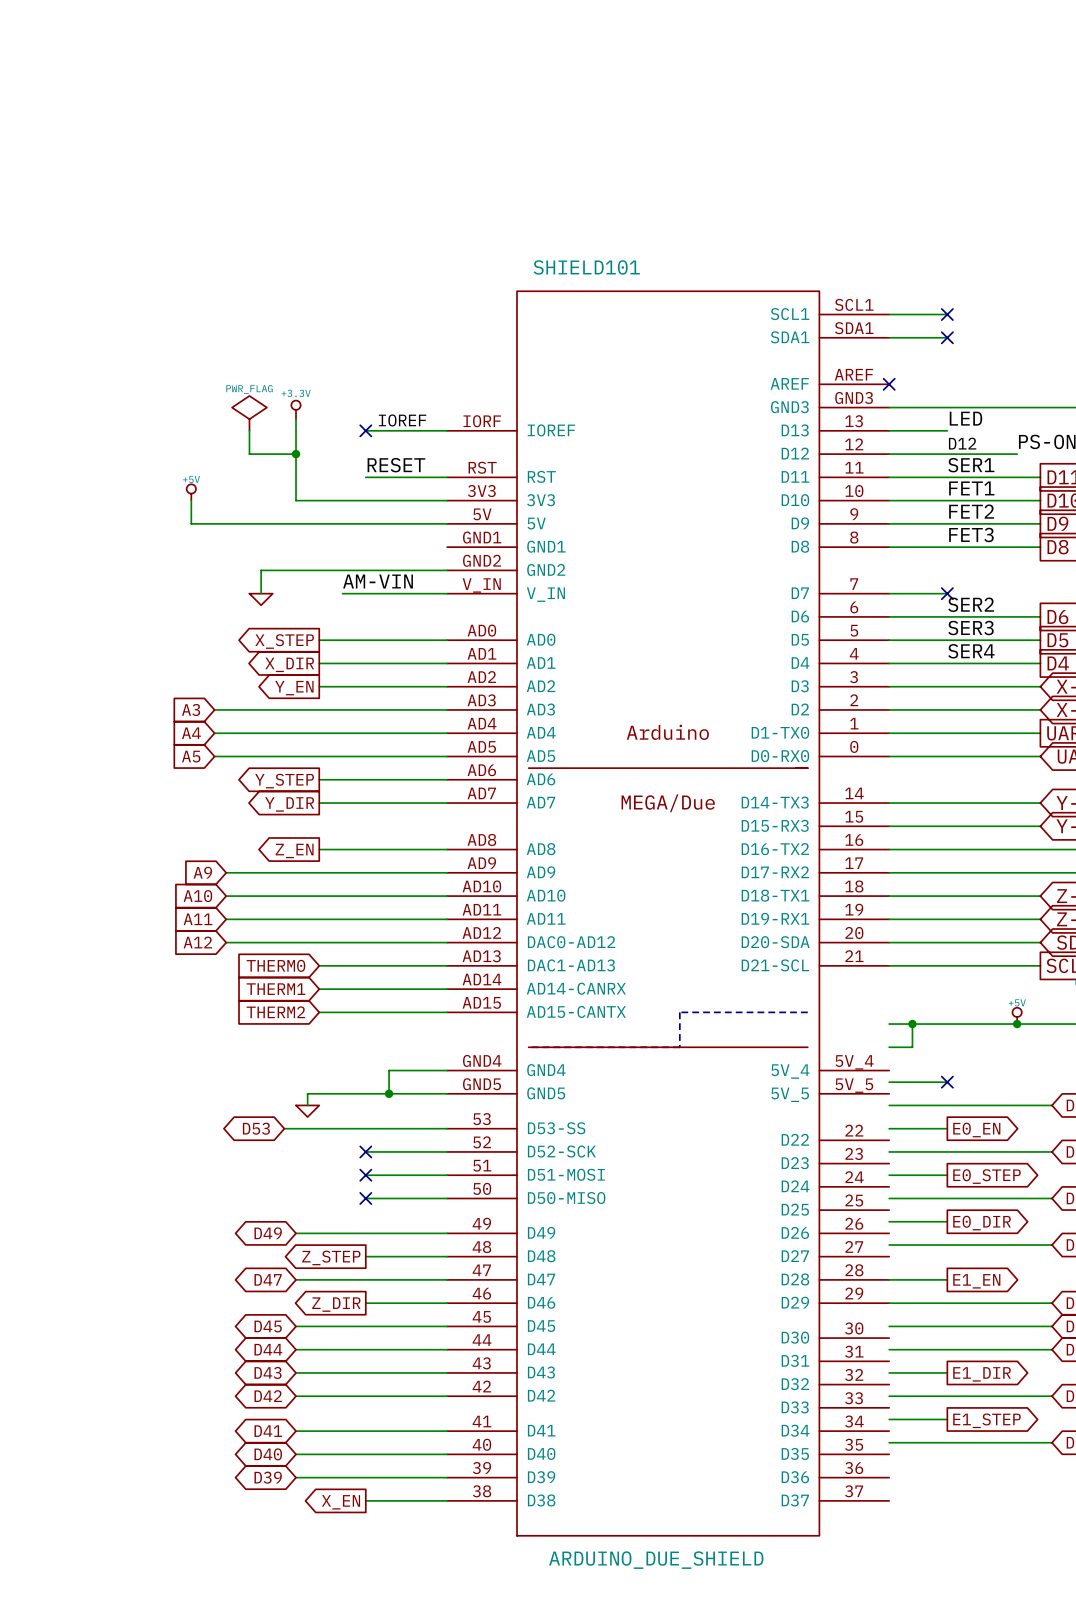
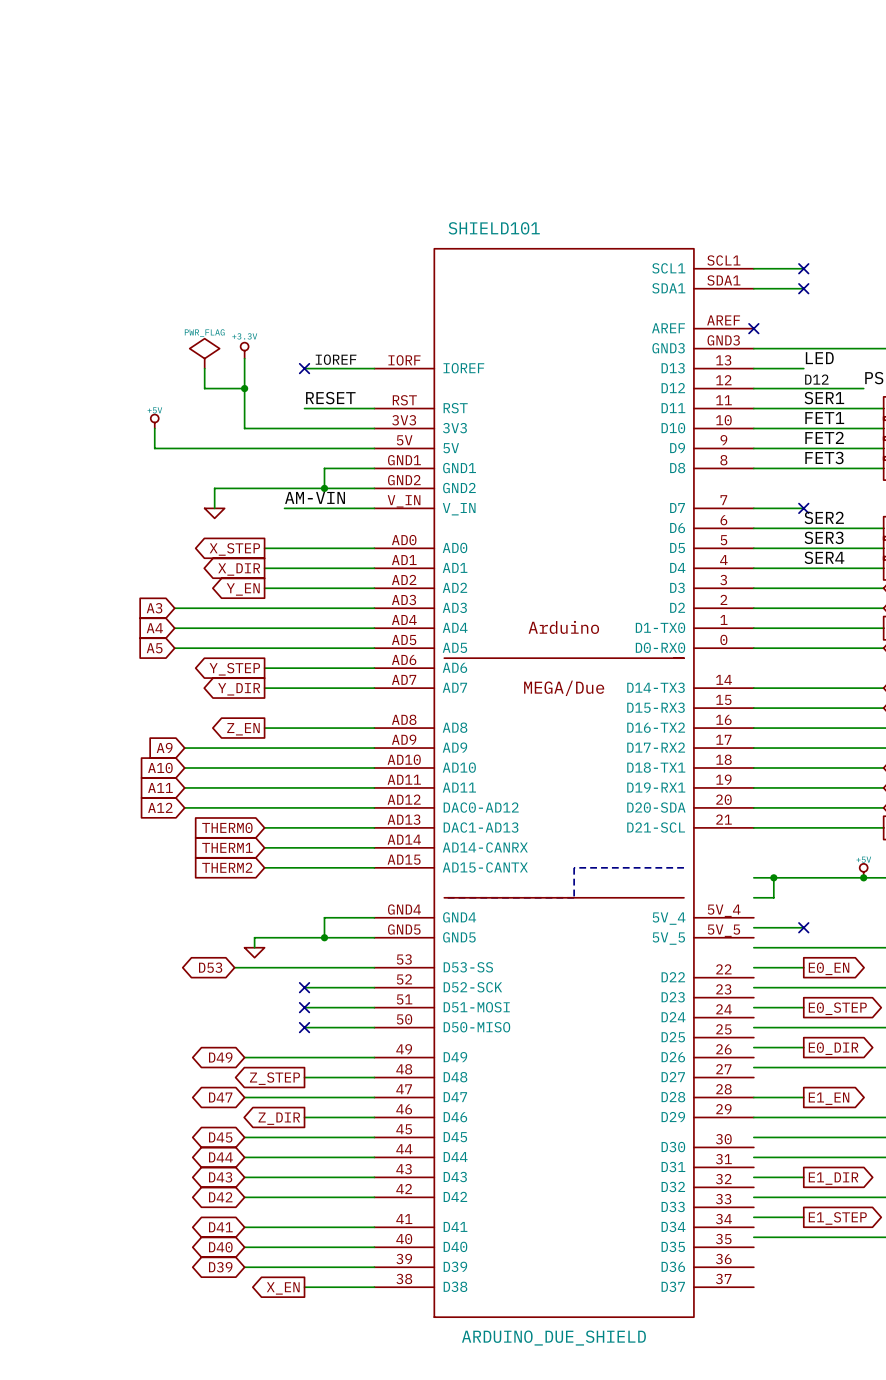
wire: none -> (374, 468) (324, 468) (324, 488)
junction: none -> (324, 488)

